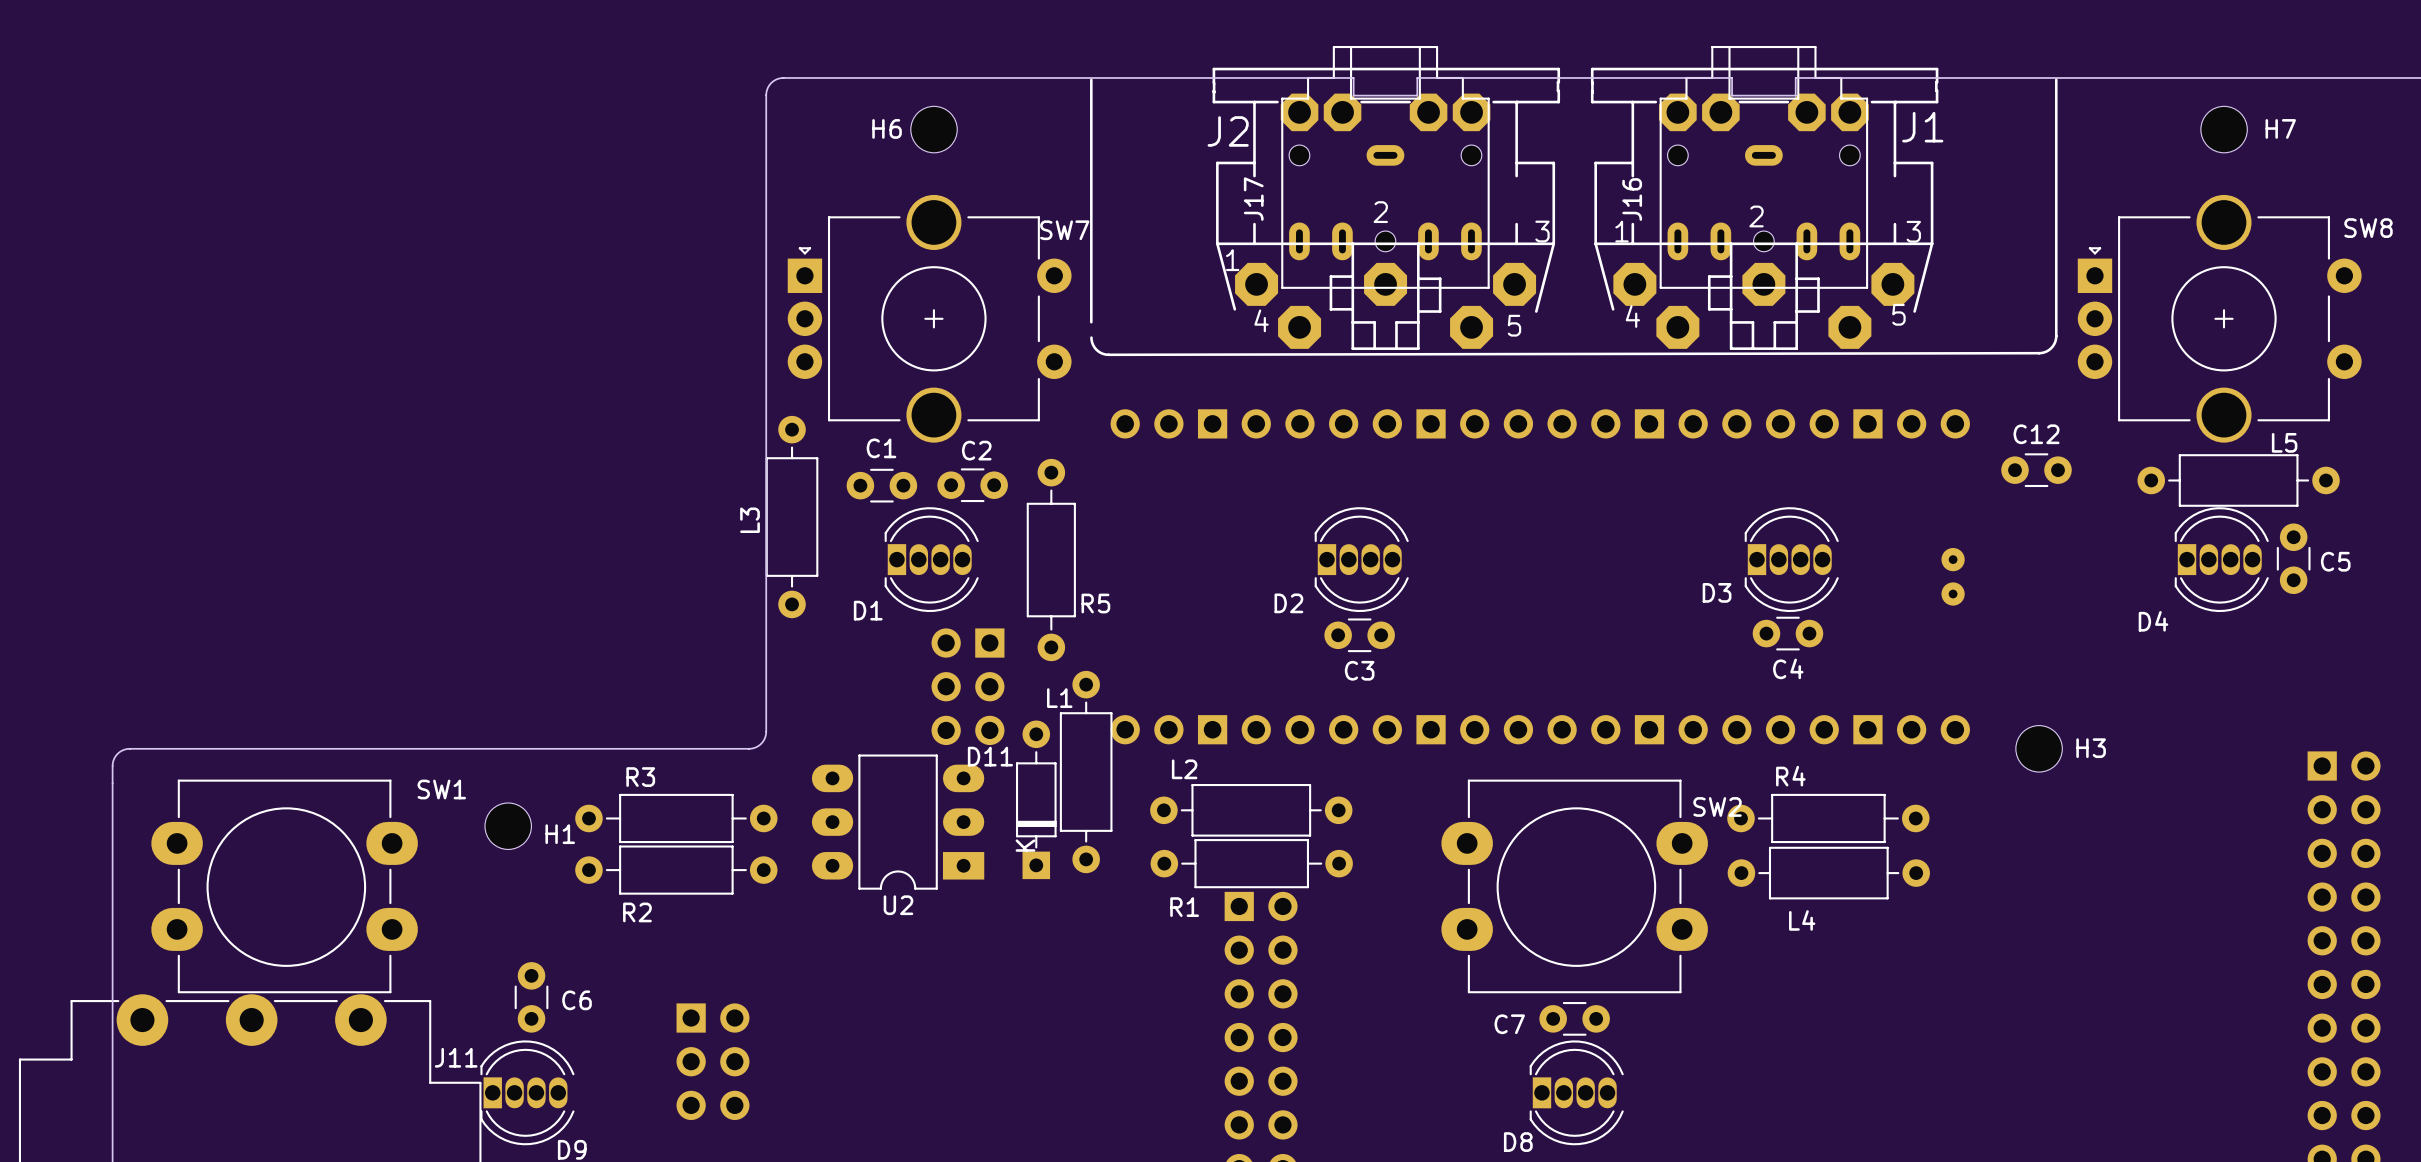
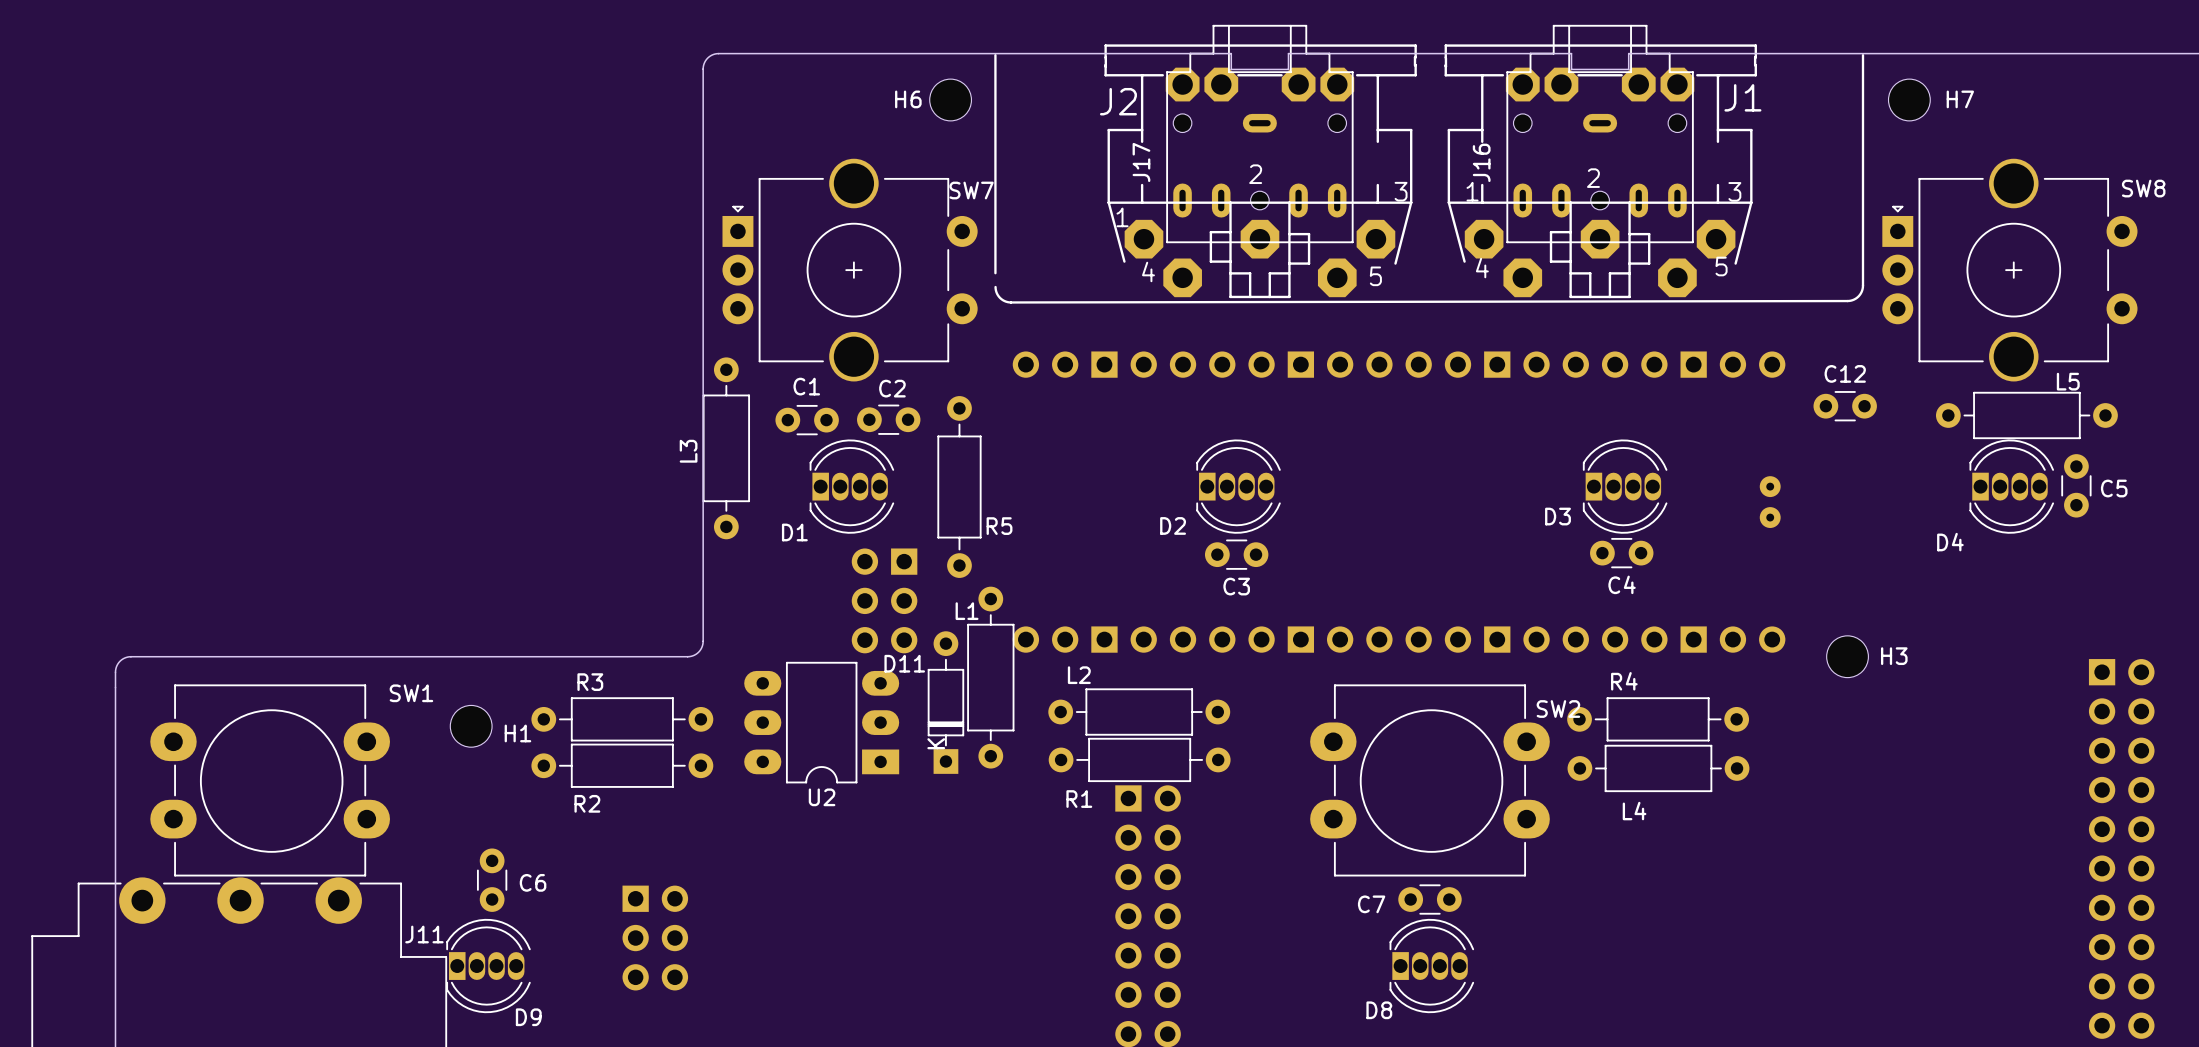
H6 position: (934, 129) -> (950, 100)
H7 position: (2224, 129) -> (1909, 100)

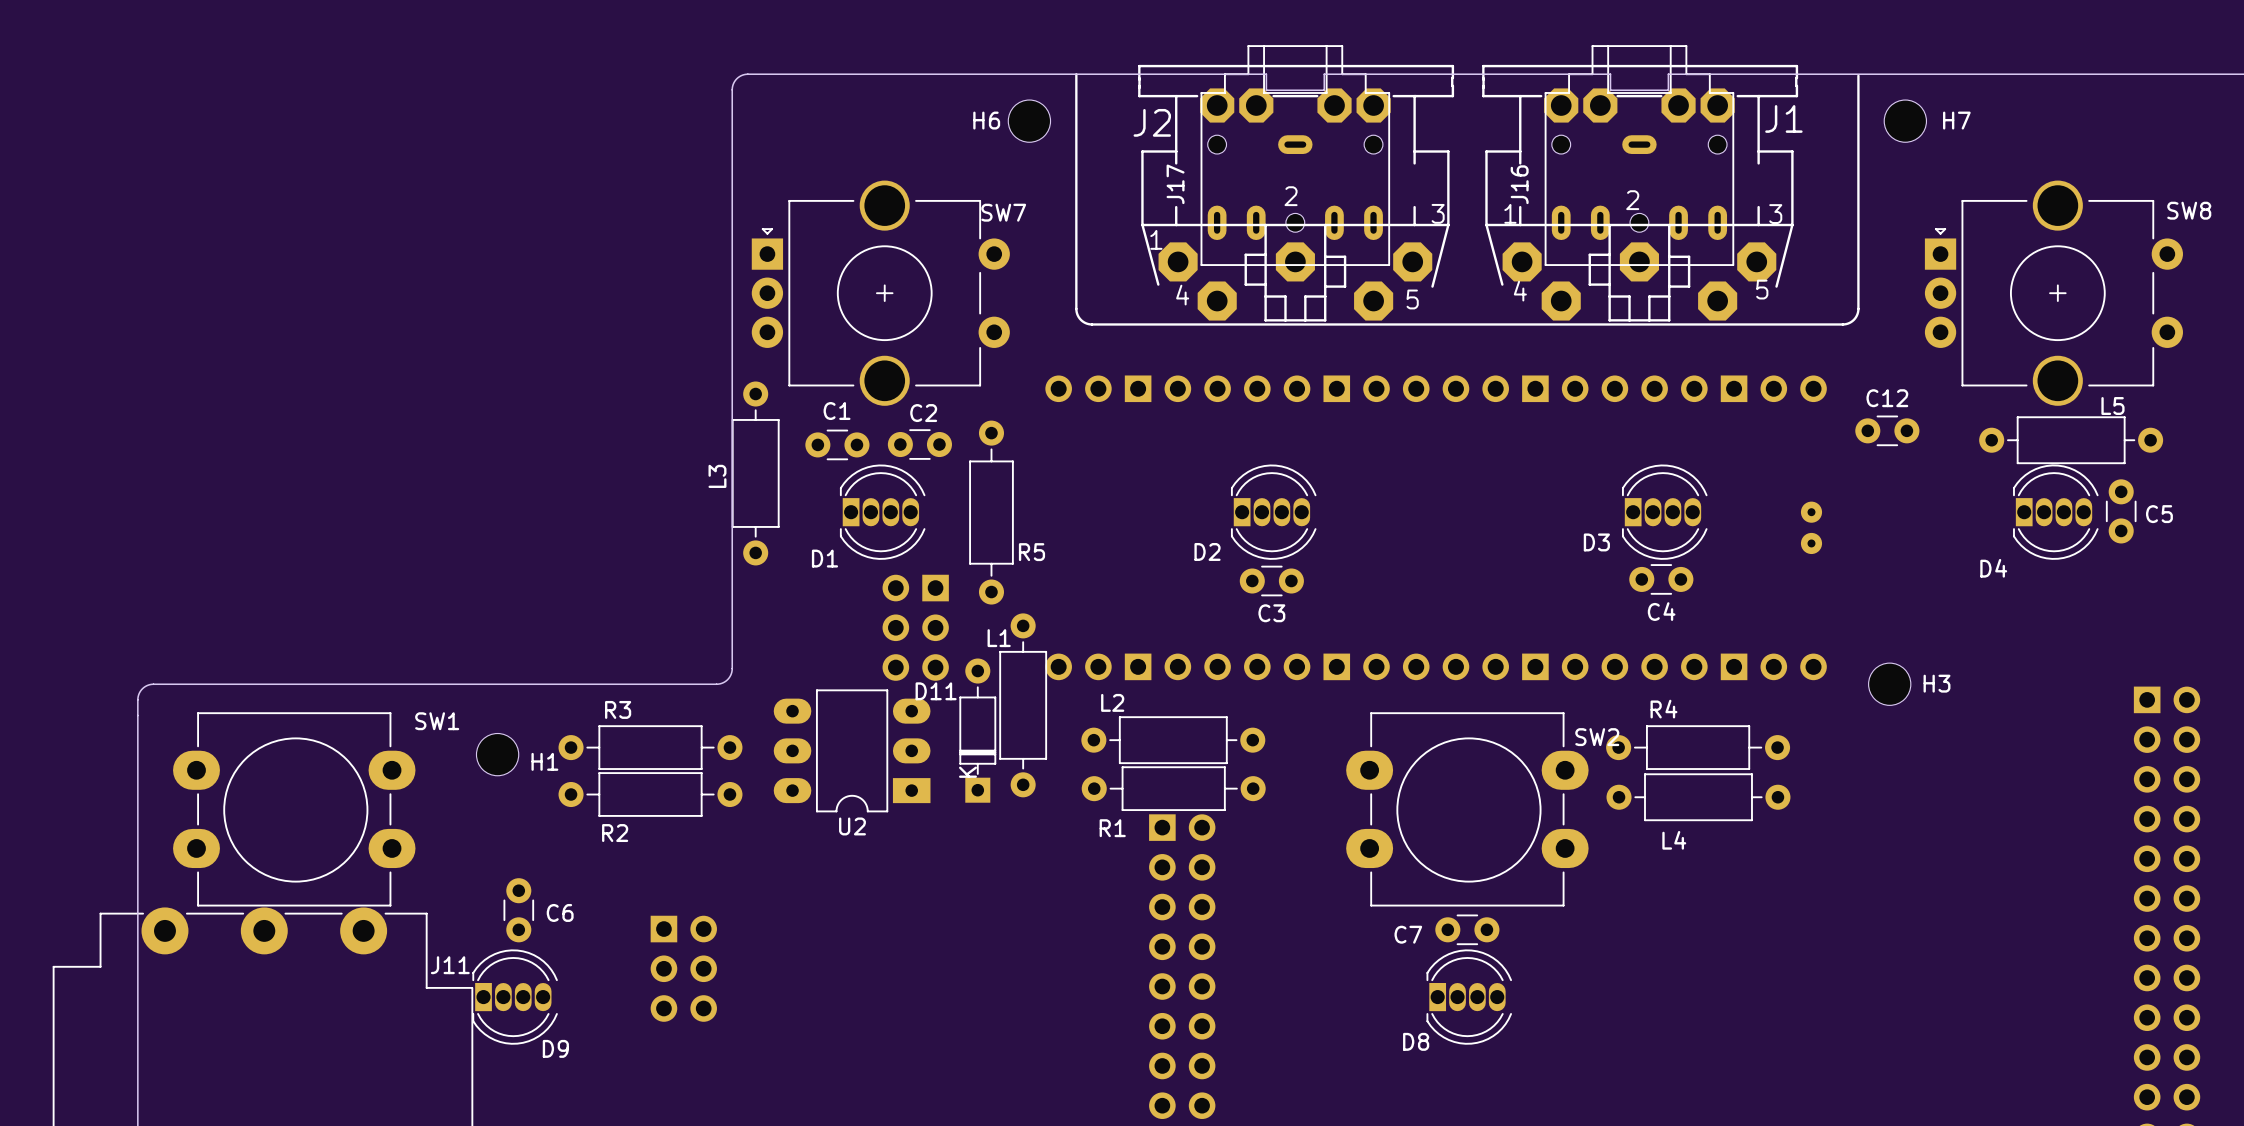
line: none -> (1076, 74) (1076, 310) (1082, 321) (1091, 324) (1847, 323) (1855, 318) (1858, 308) (1858, 75)
line: (995, 55) (995, 273) -> none
line: (1863, 55) (1863, 285) (1859, 295) (1850, 300) (1011, 302) (1000, 297) (995, 287) -> none
H6 position: (950, 100) -> (1029, 121)
H7 position: (1909, 100) -> (1905, 121)

